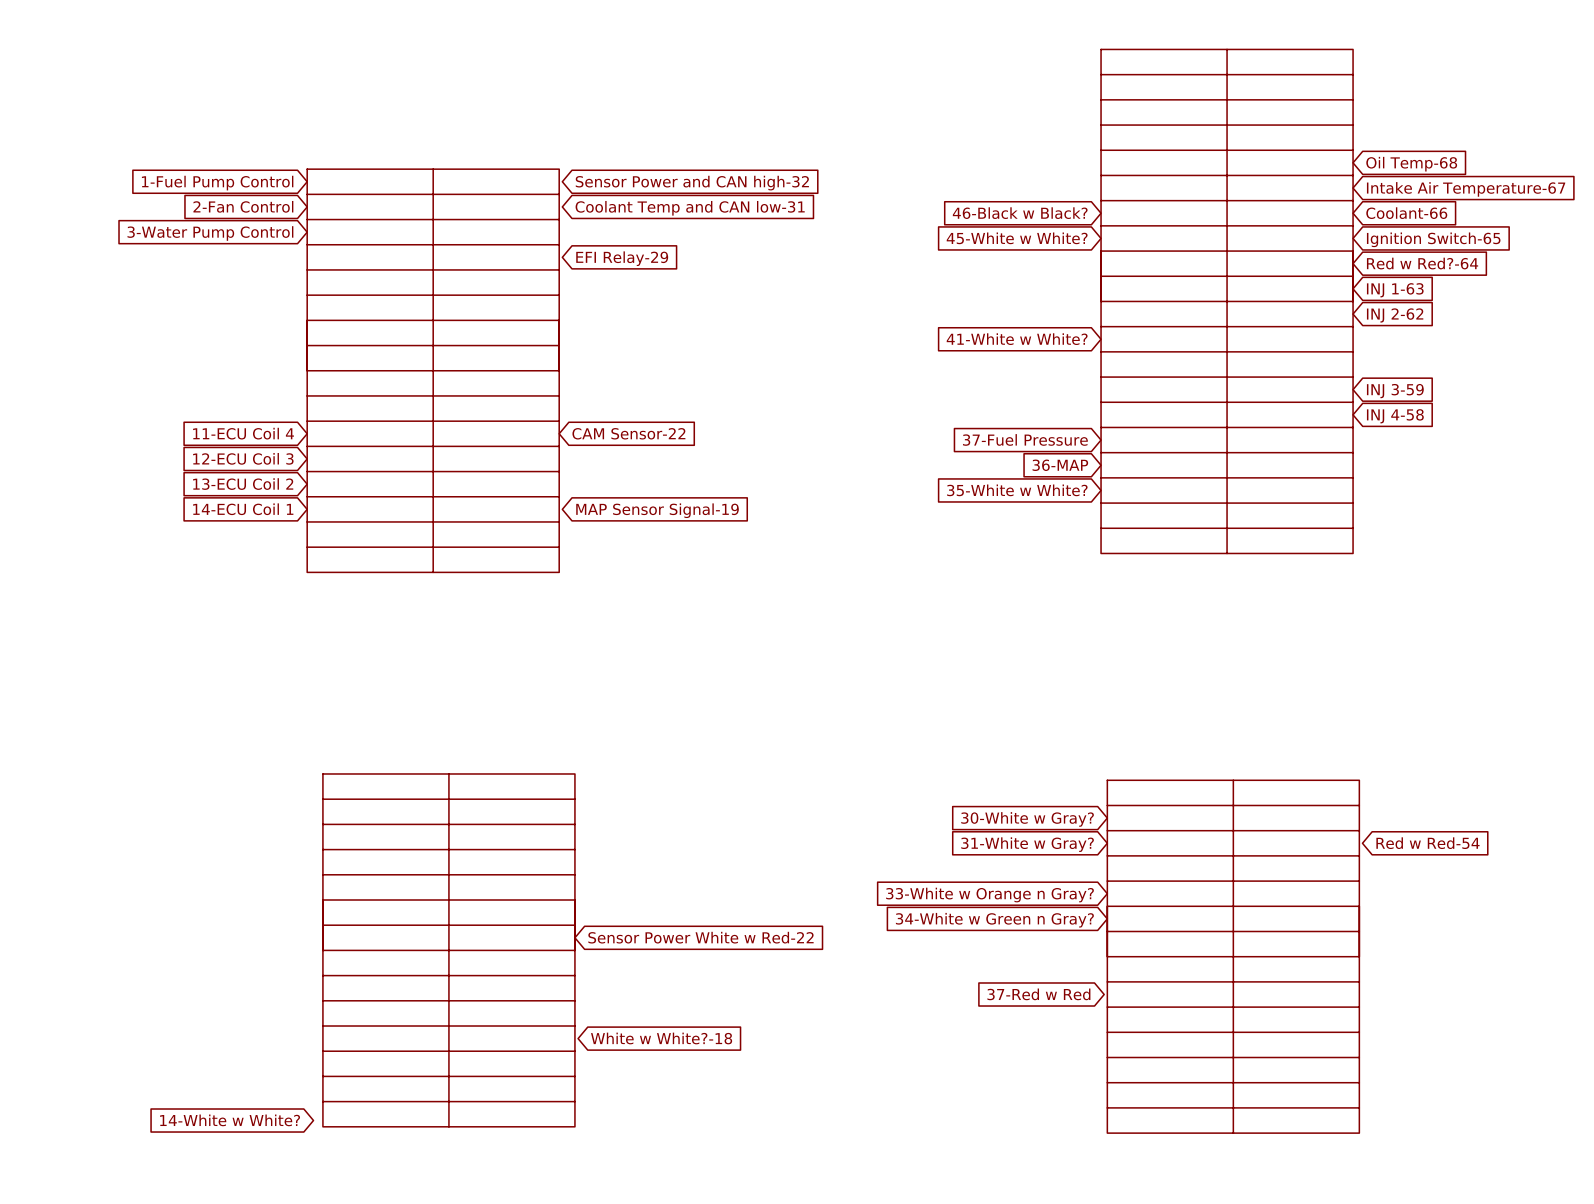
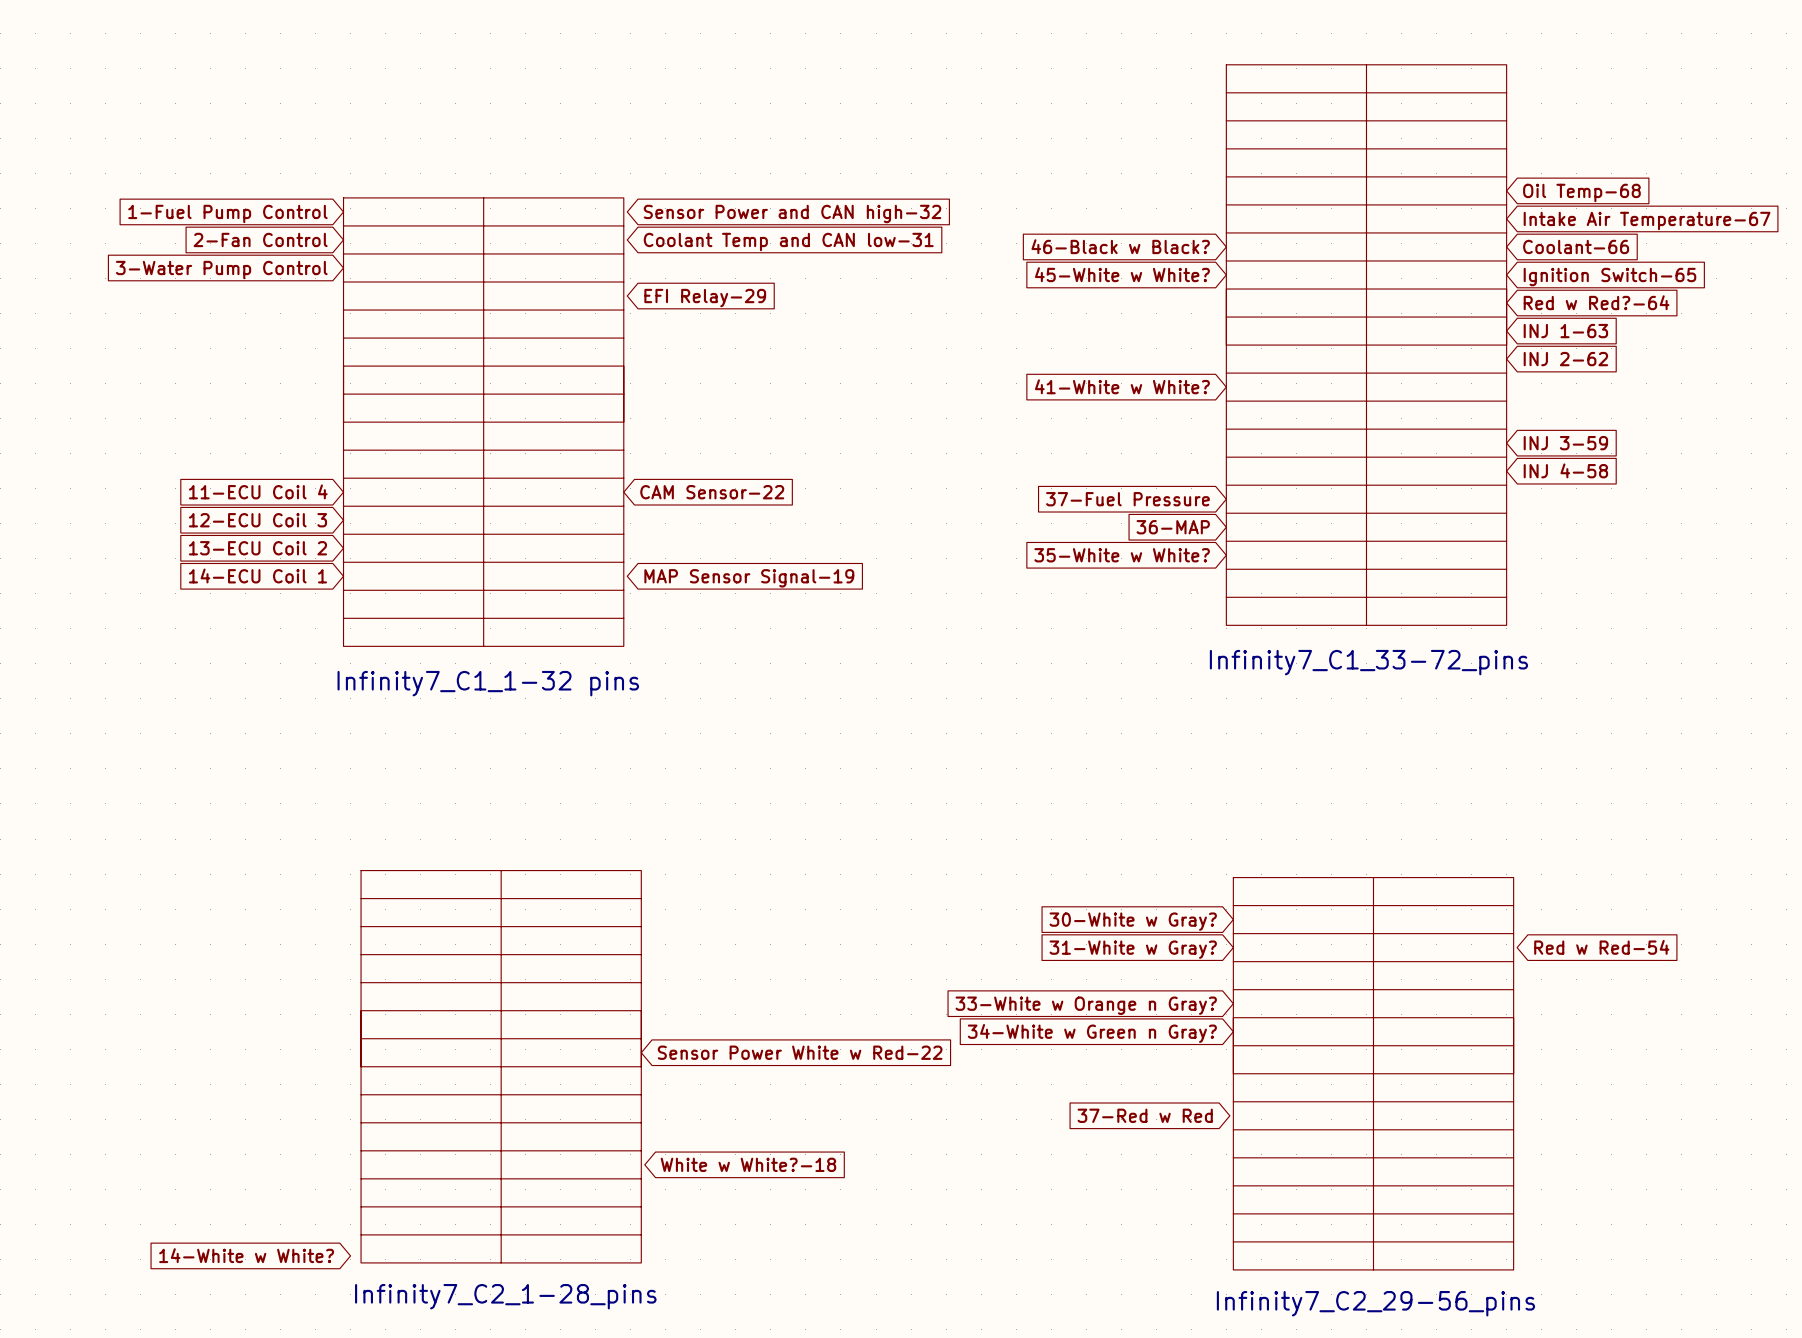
part value: none -> Infinity7_C1_33-72_pins (1368, 662)
part value: none -> Infinity7_C1_1-32 pins (488, 683)
part value: none -> Infinity7_C2_1-28_pins (505, 1296)
part value: none -> Infinity7_C2_29-56_pins (1375, 1303)

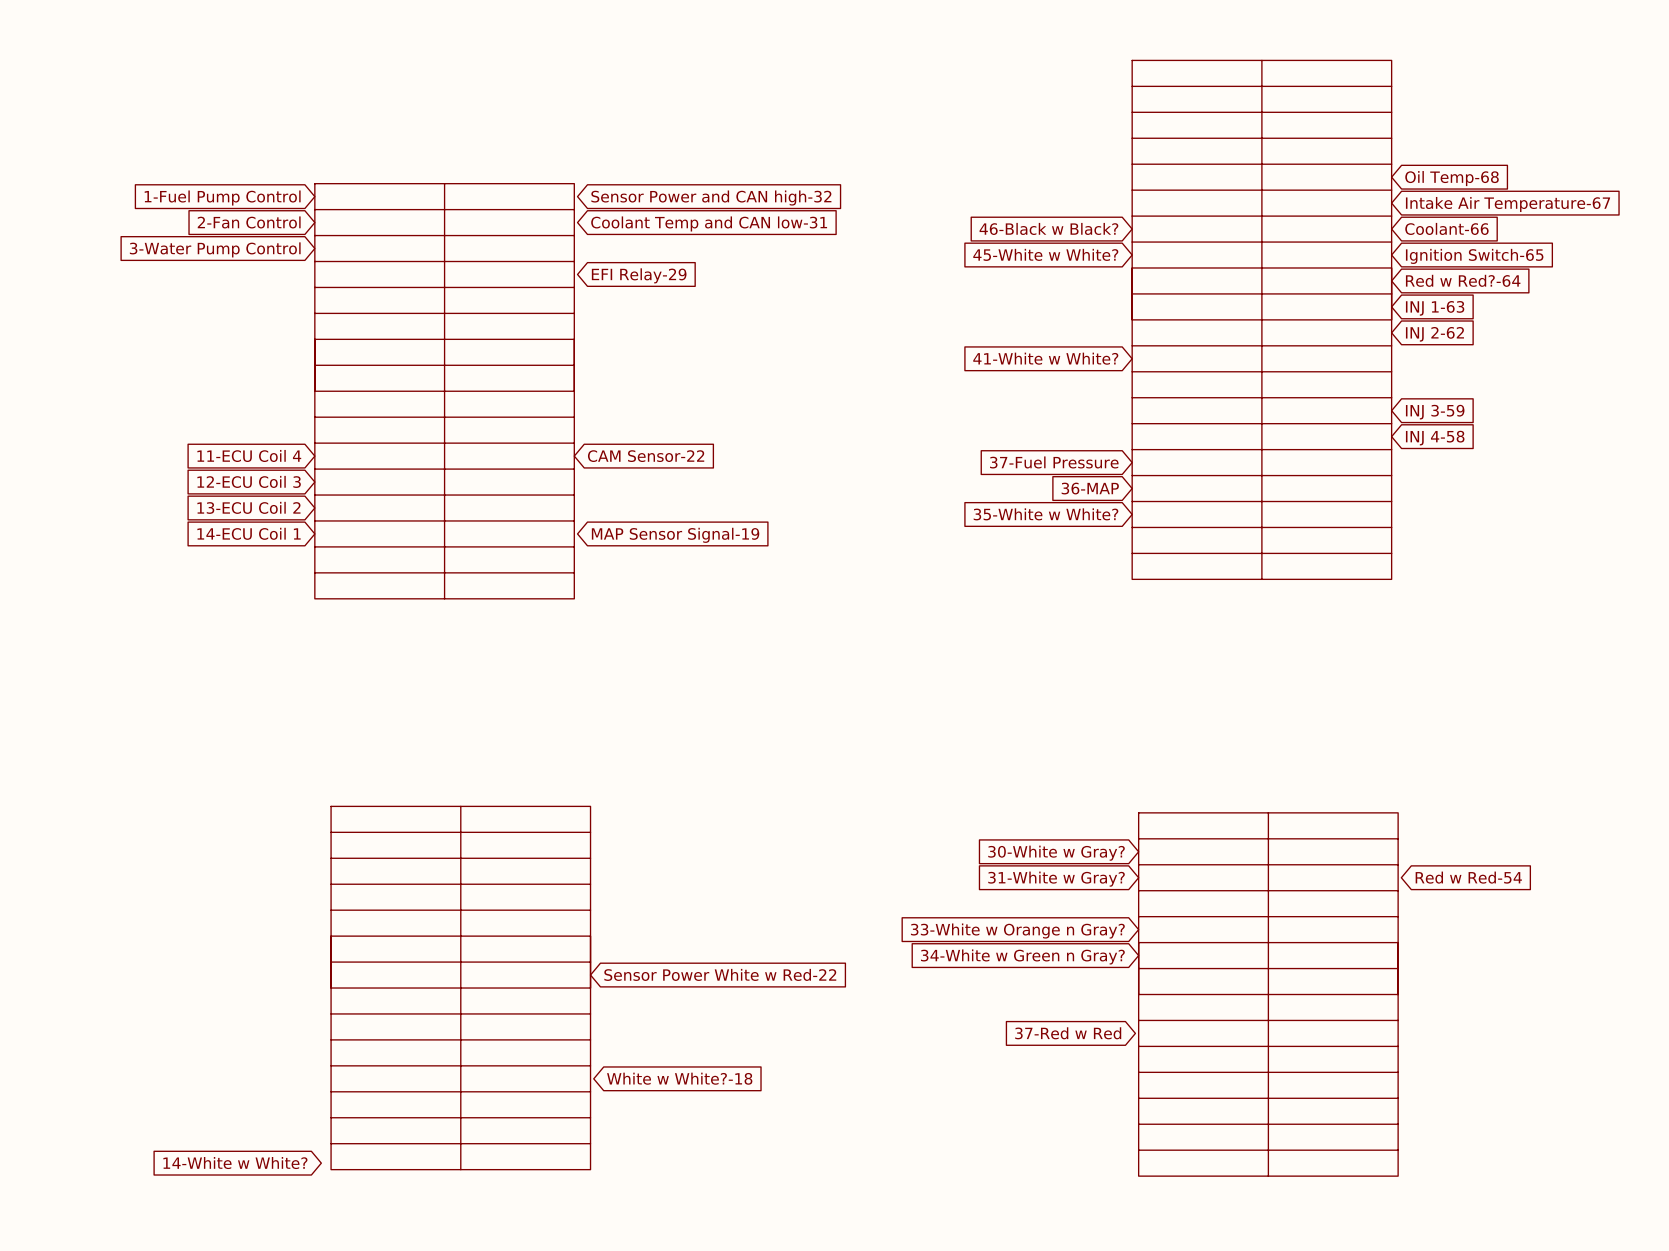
part value: Infinity7_C1_33-72_pins (1368, 662) -> none
part value: Infinity7_C1_1-32 pins (488, 683) -> none
part value: Infinity7_C2_1-28_pins (505, 1296) -> none
part value: Infinity7_C2_29-56_pins (1375, 1303) -> none

